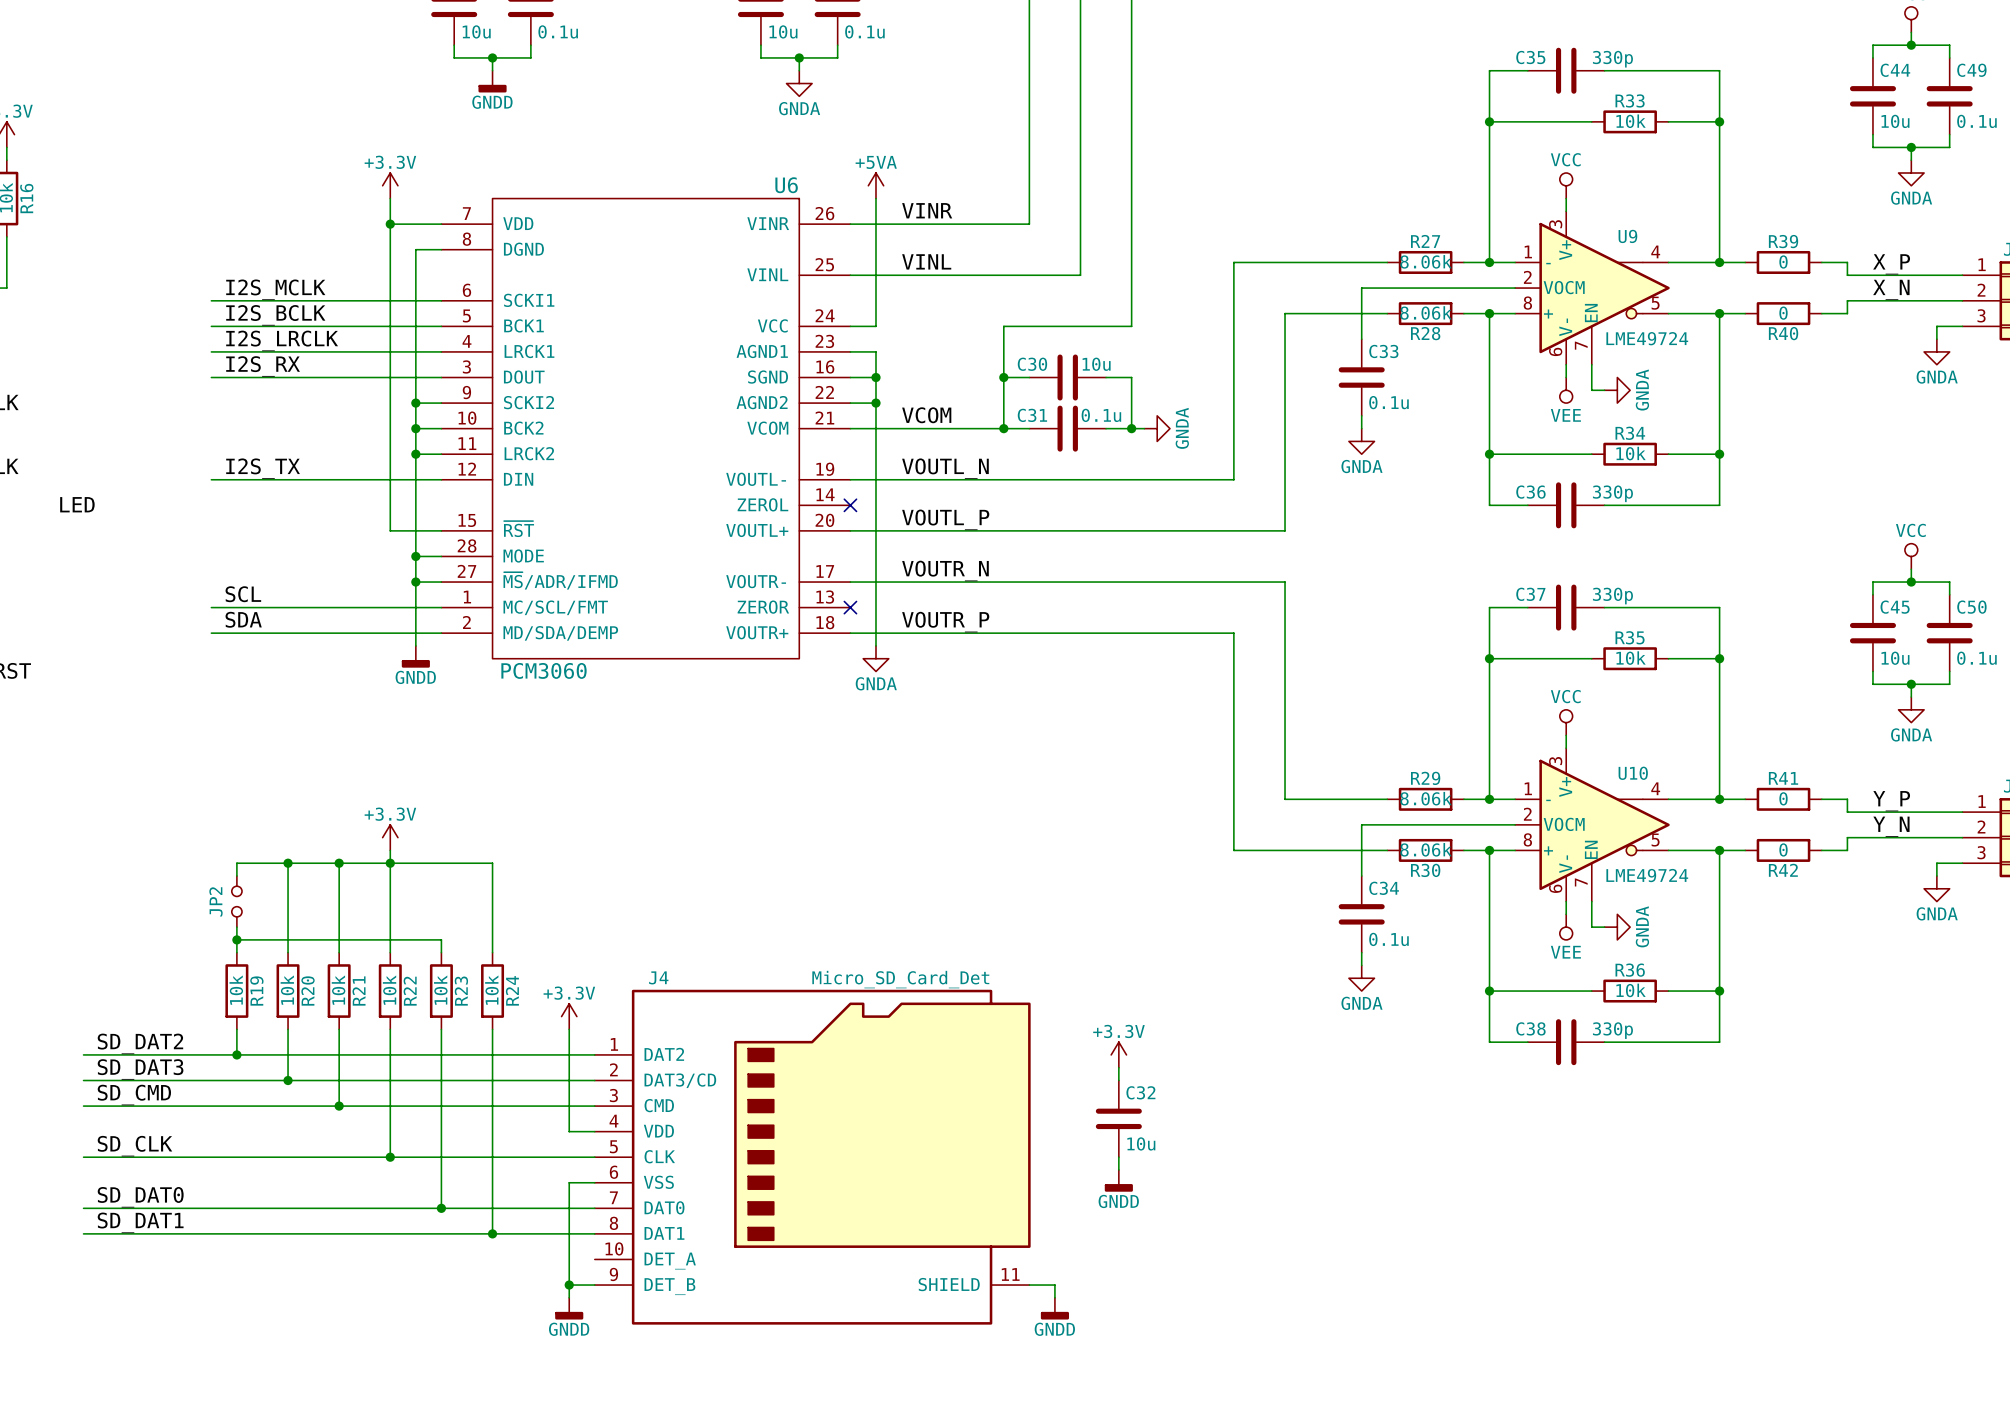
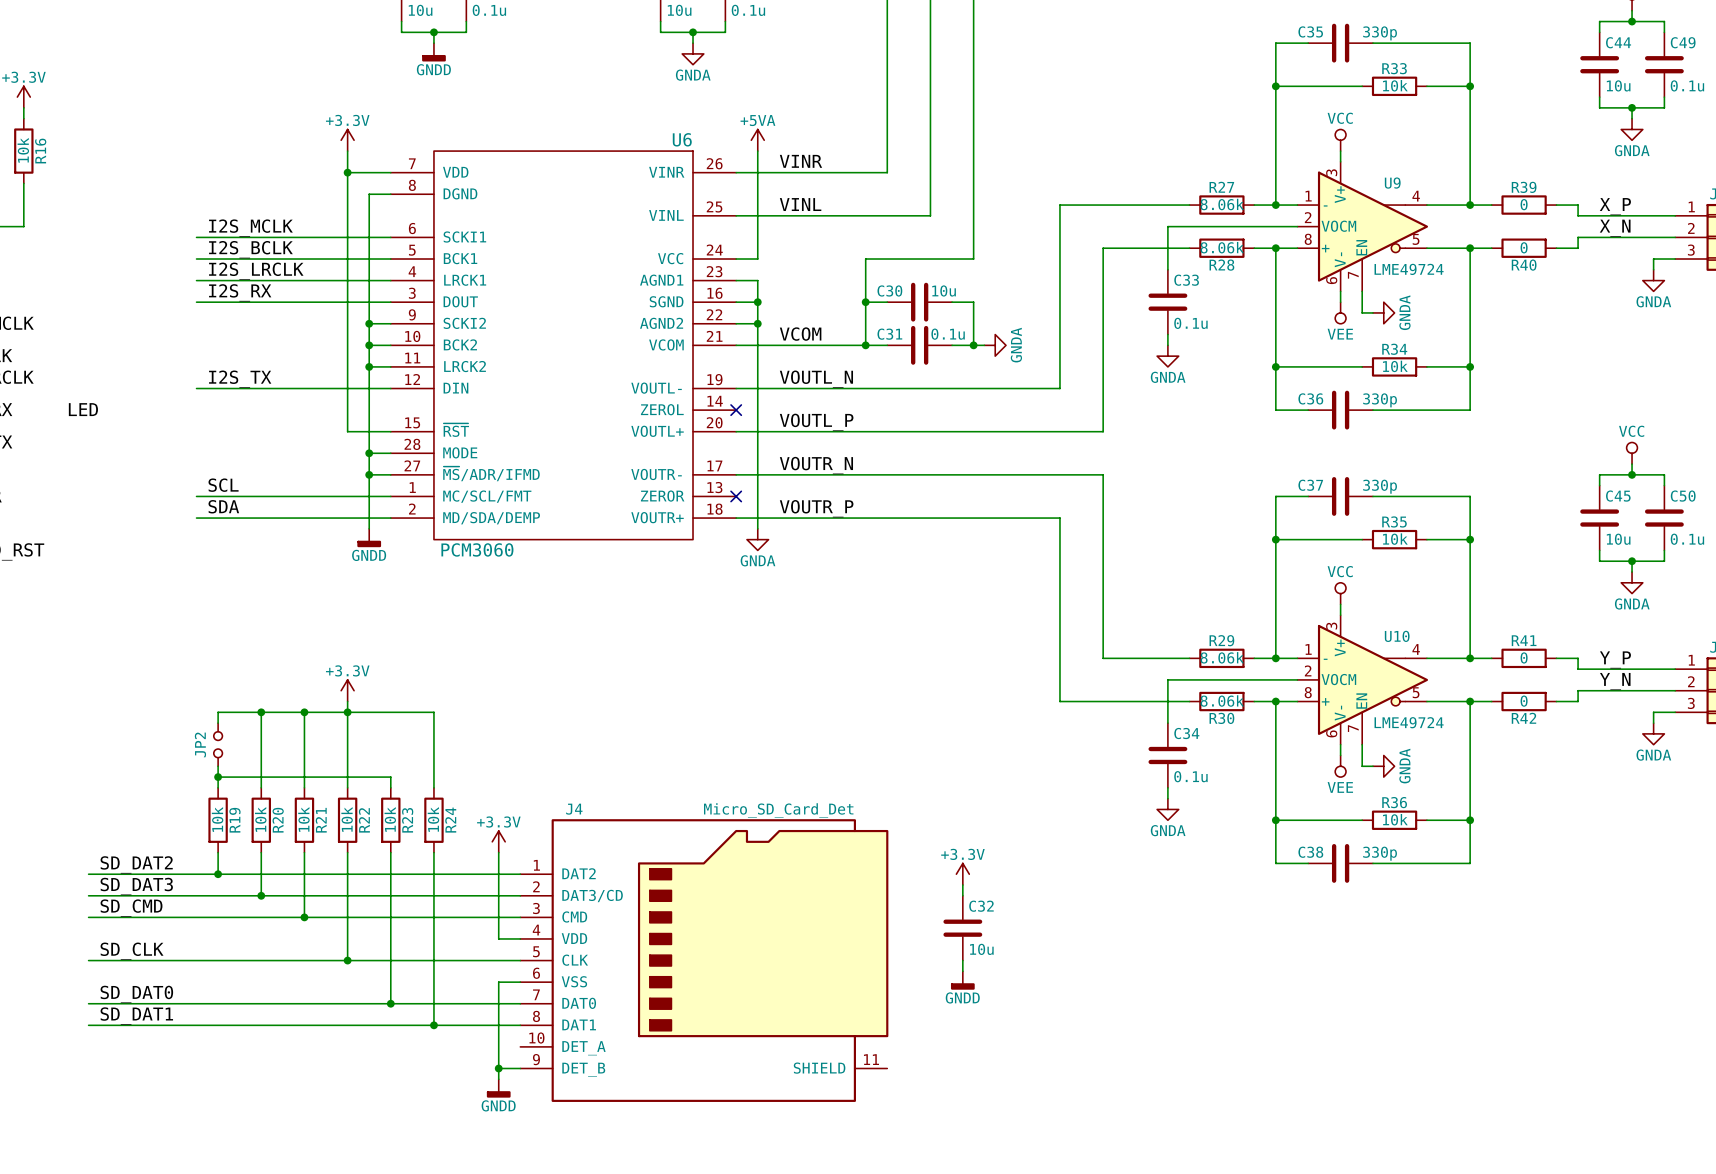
wire: (1029, 1285) (1054, 1285) (1054, 1297) -> none
power symbol: GNDD (1054, 1308) -> none

